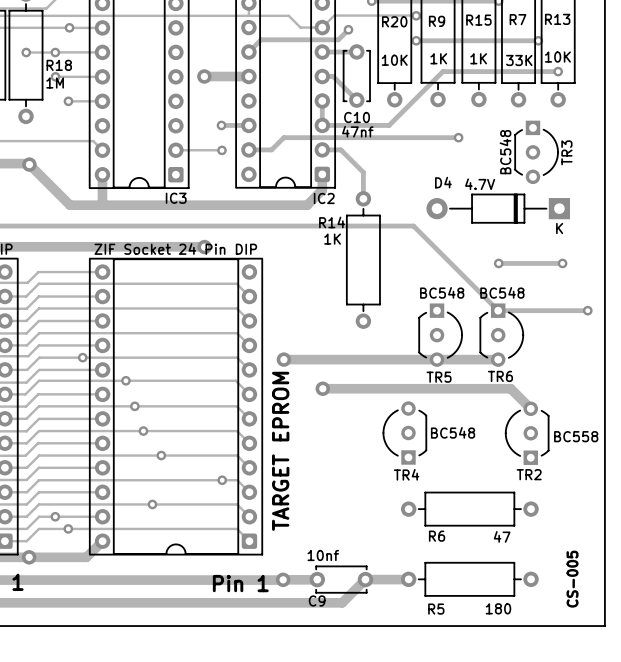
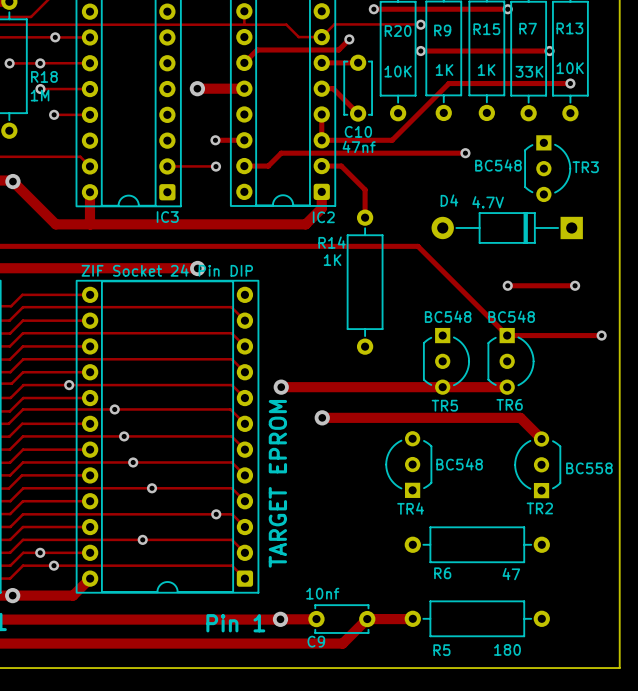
TR3 value rotation: 0° (505, 152) -> 90° clockwise (498, 165)
TR3 name rotation: 0° (566, 152) -> 90° clockwise (585, 167)
D4 text: K (559, 228) -> none
text: CS-005 (572, 579) -> none

